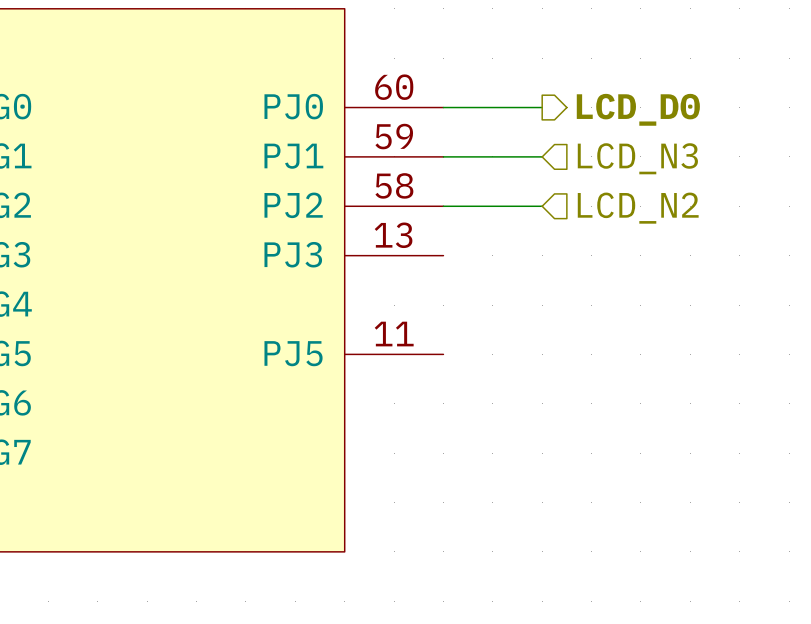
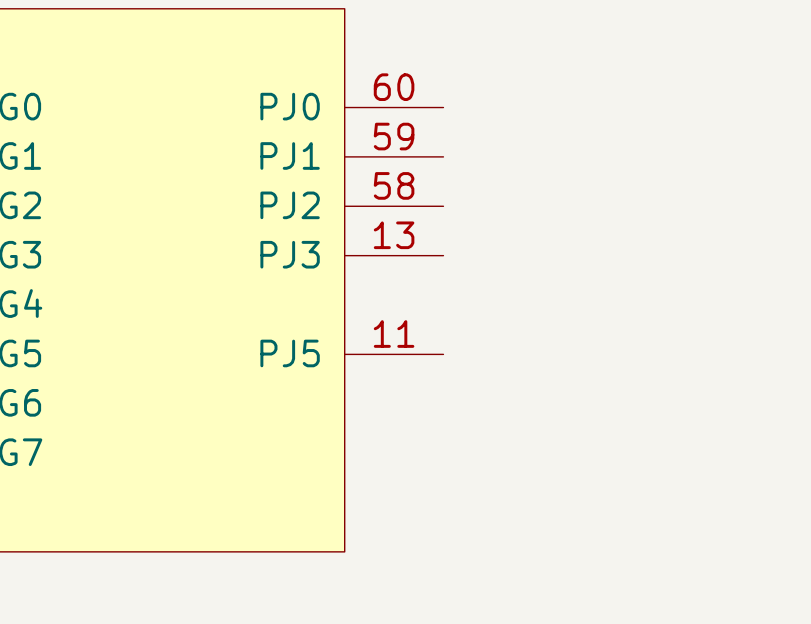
wire: (443, 107) (542, 107) -> none
hierarchical label: LCD_D0 (638, 109) -> none
wire: (443, 156) (542, 156) -> none
hierarchical label: LCD_N3 (637, 158) -> none
wire: (443, 206) (542, 206) -> none
hierarchical label: LCD_N2 (638, 208) -> none

